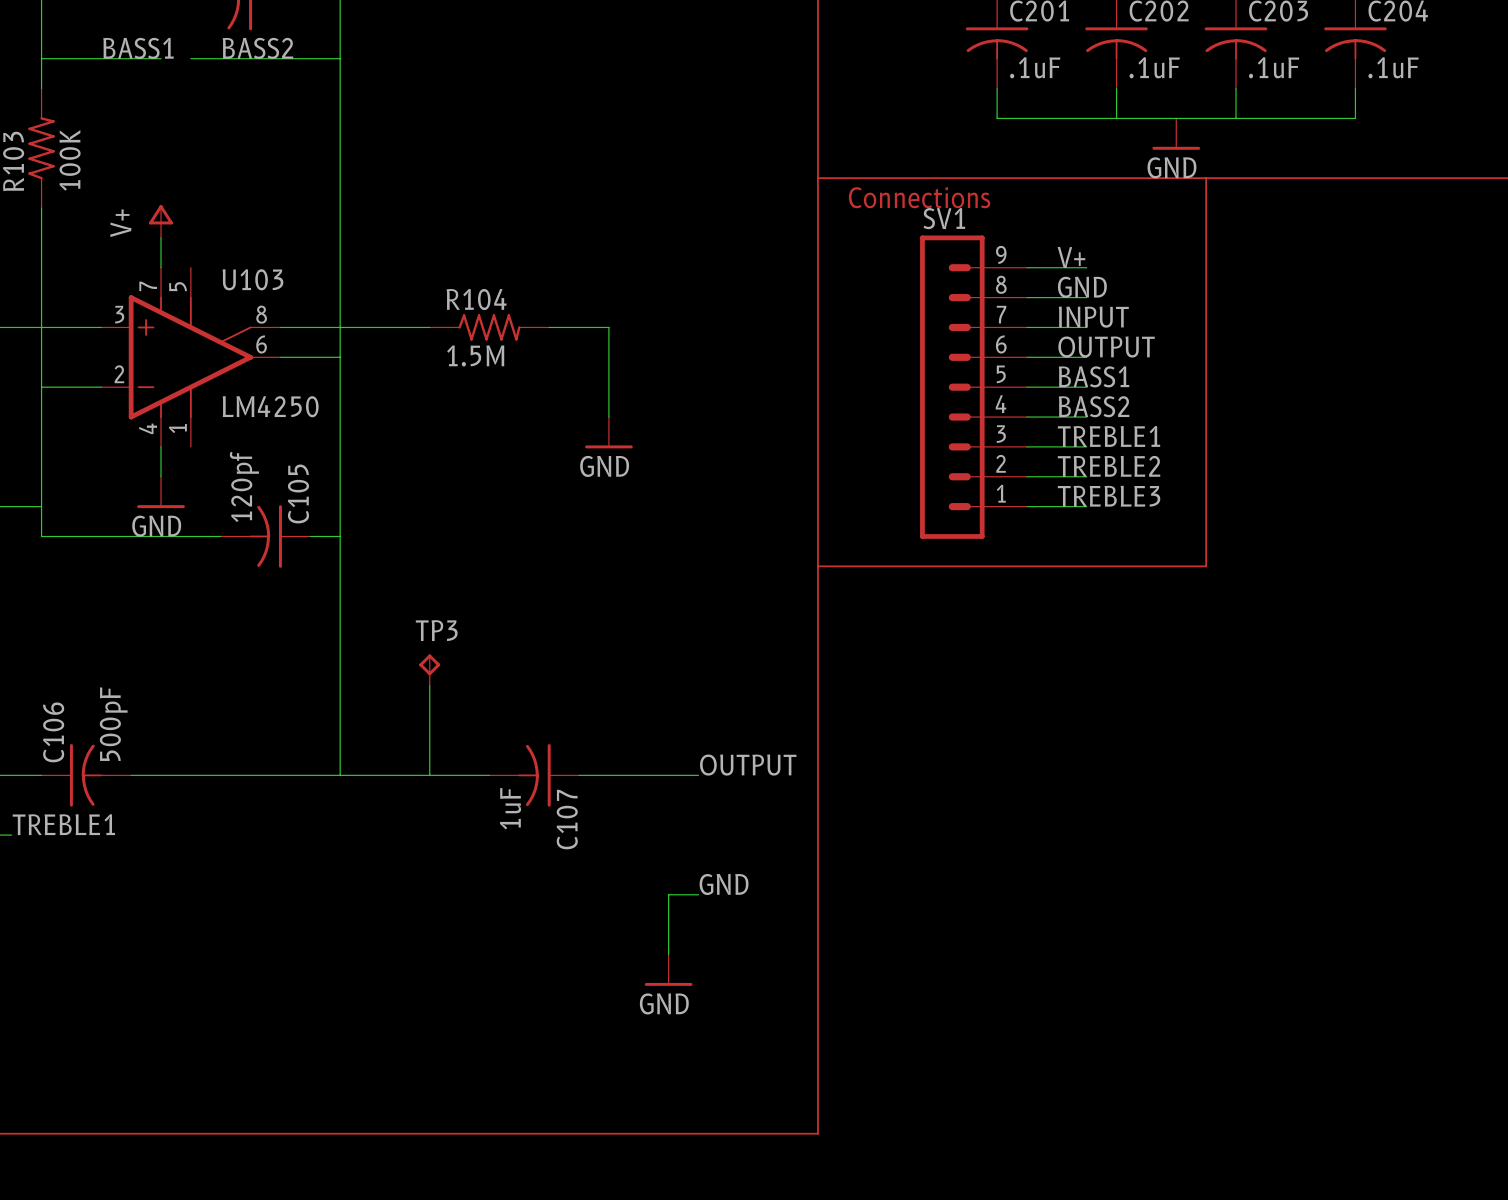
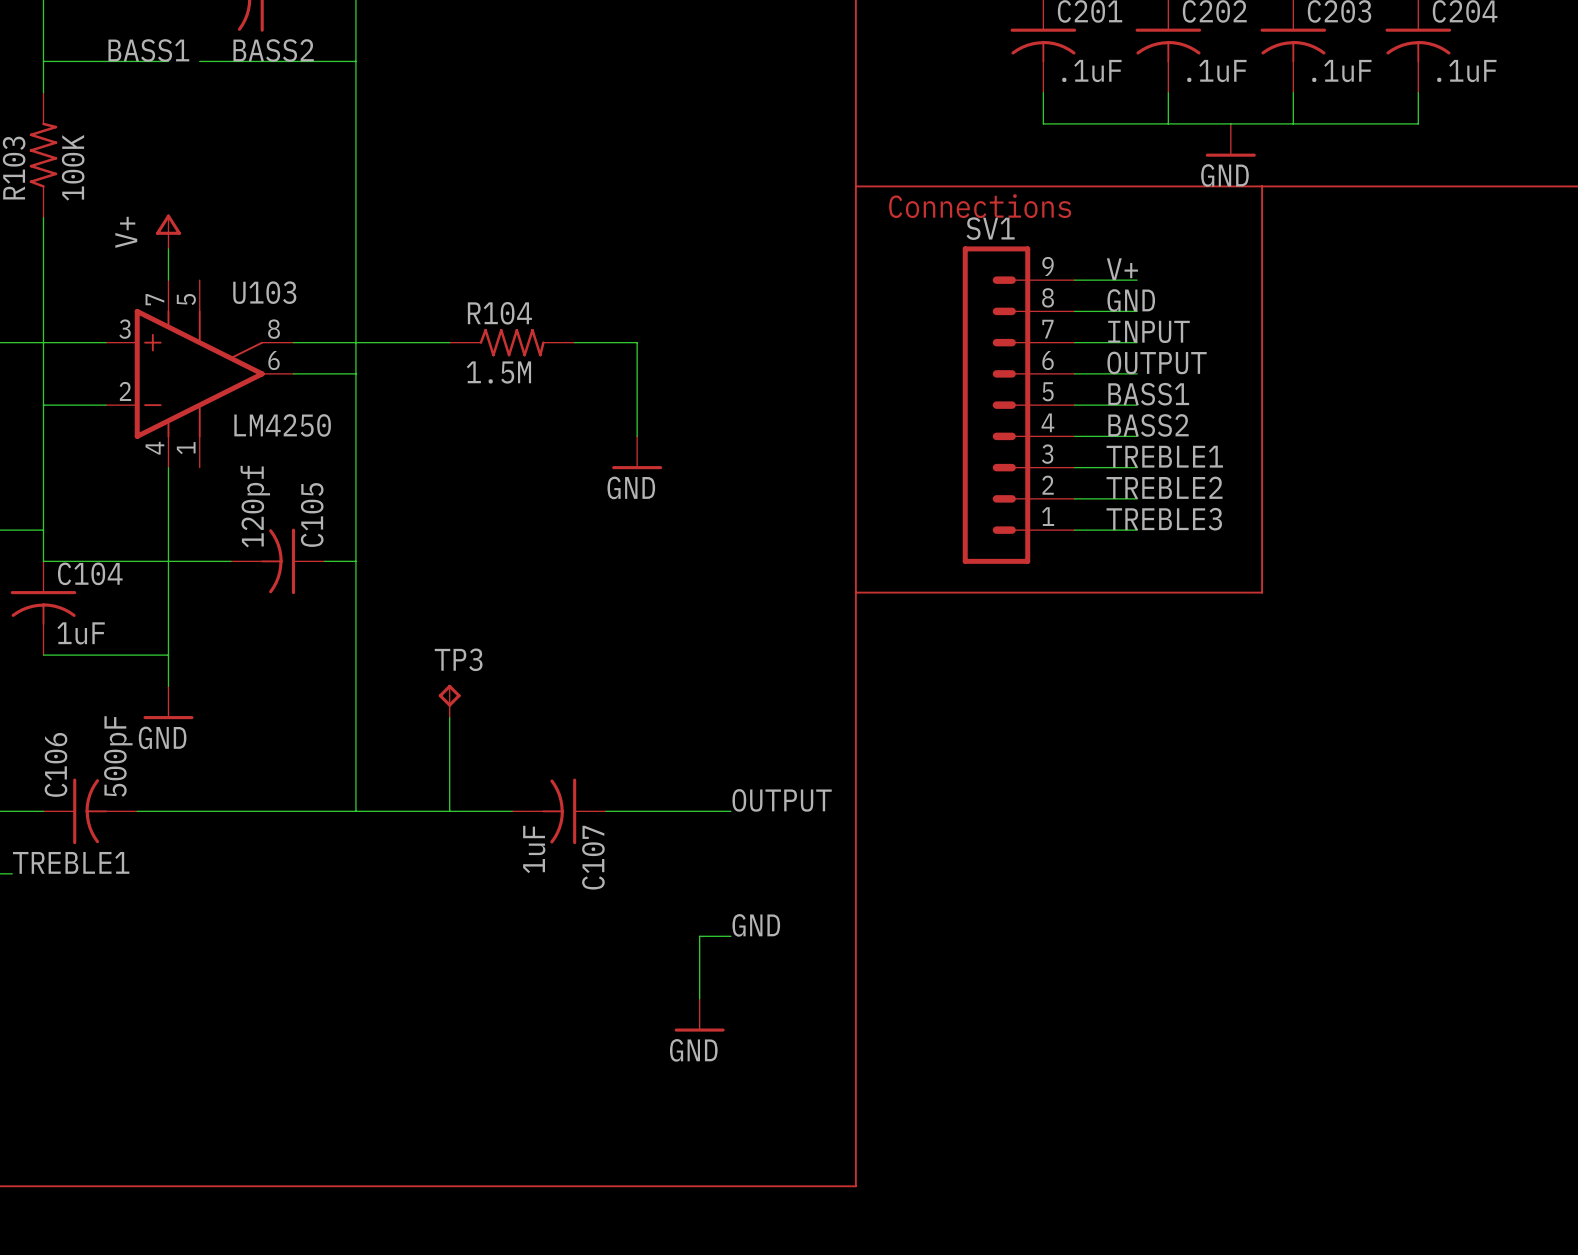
wire: none -> (168, 498) (168, 686)
power symbol position: GND (161, 492) -> GND (168, 702)
C104: none -> 1uF (43, 608)
wire: none -> (43, 655) (168, 655)

